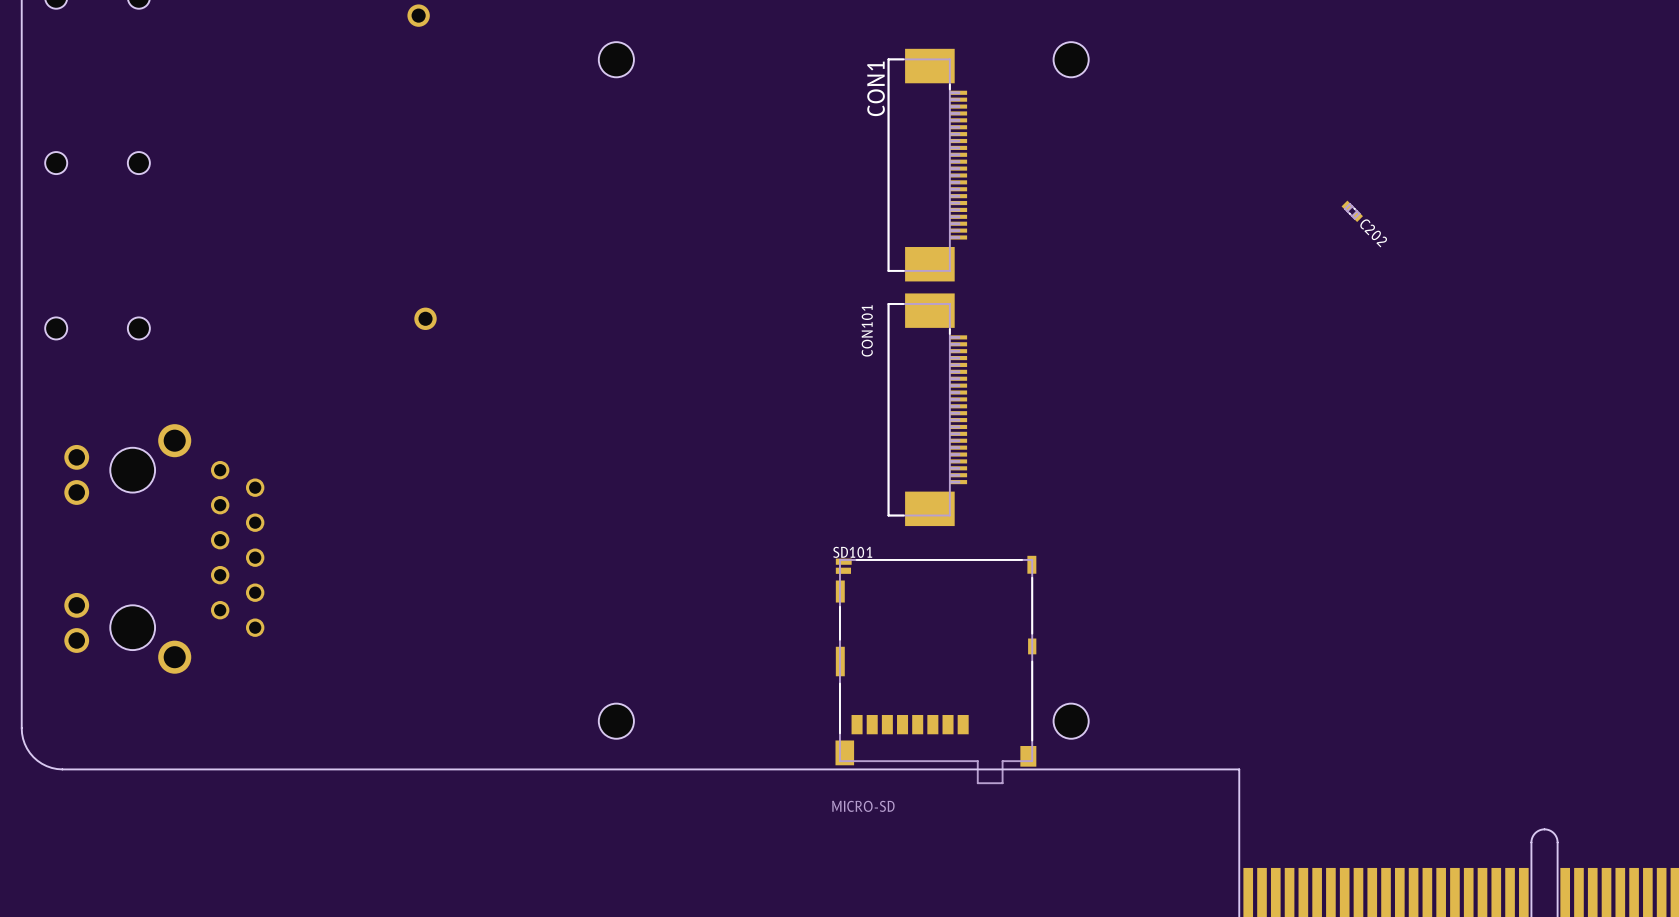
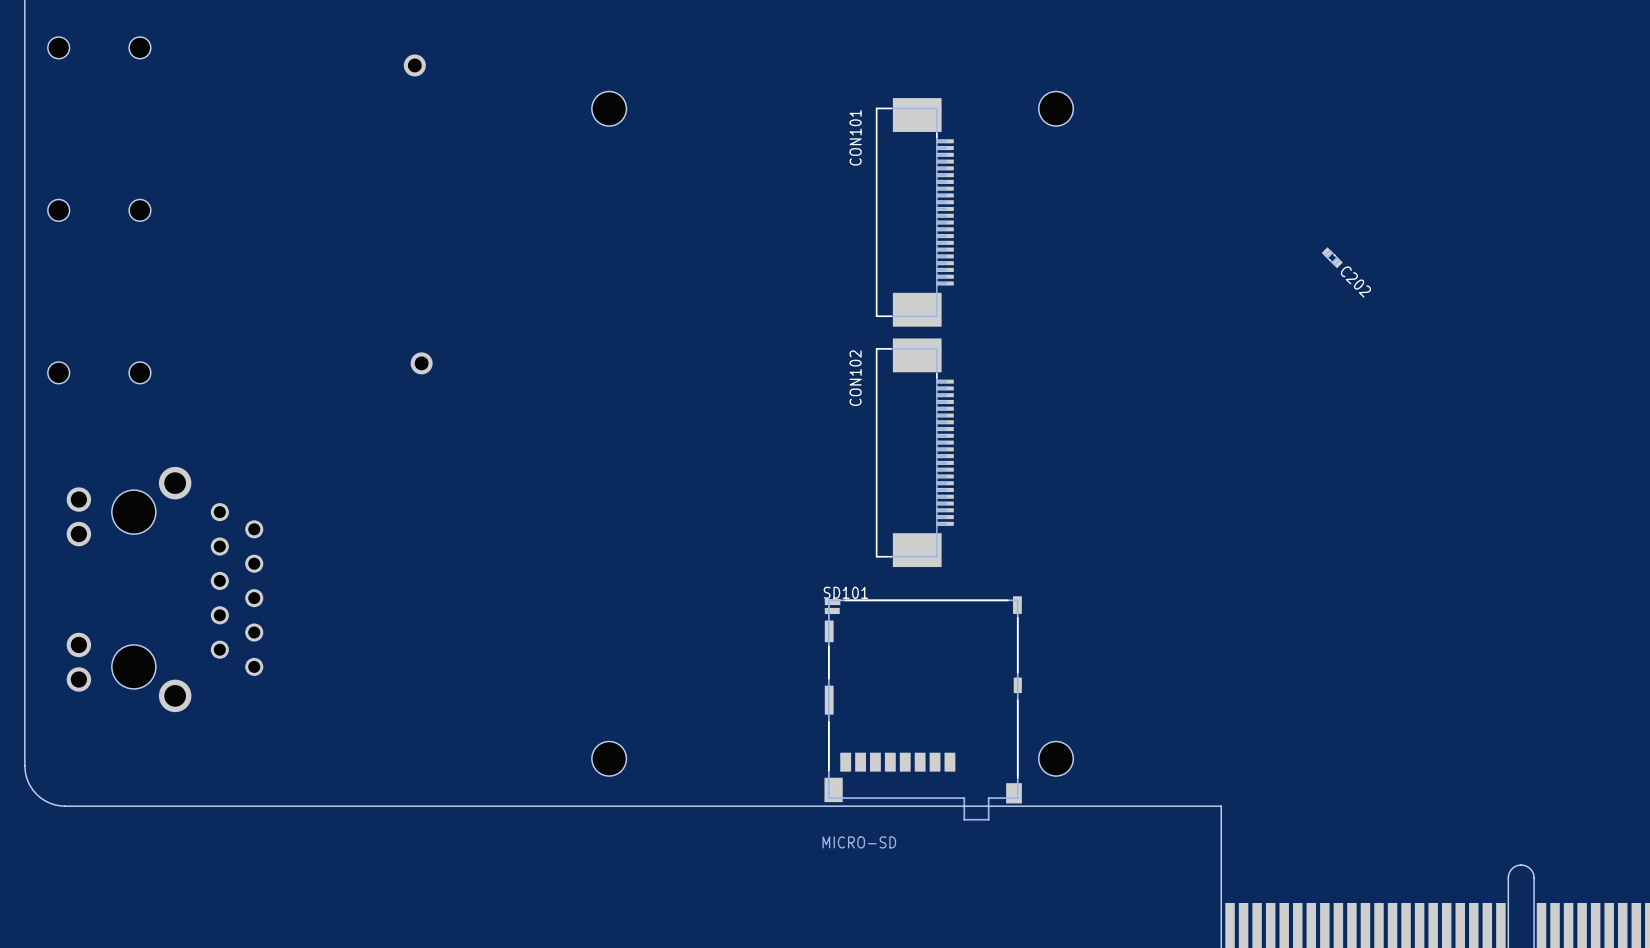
CON1 name: CON1 (876, 88) -> CON101 (855, 137)
CON101 name: CON101 (867, 330) -> CON102 (855, 378)

